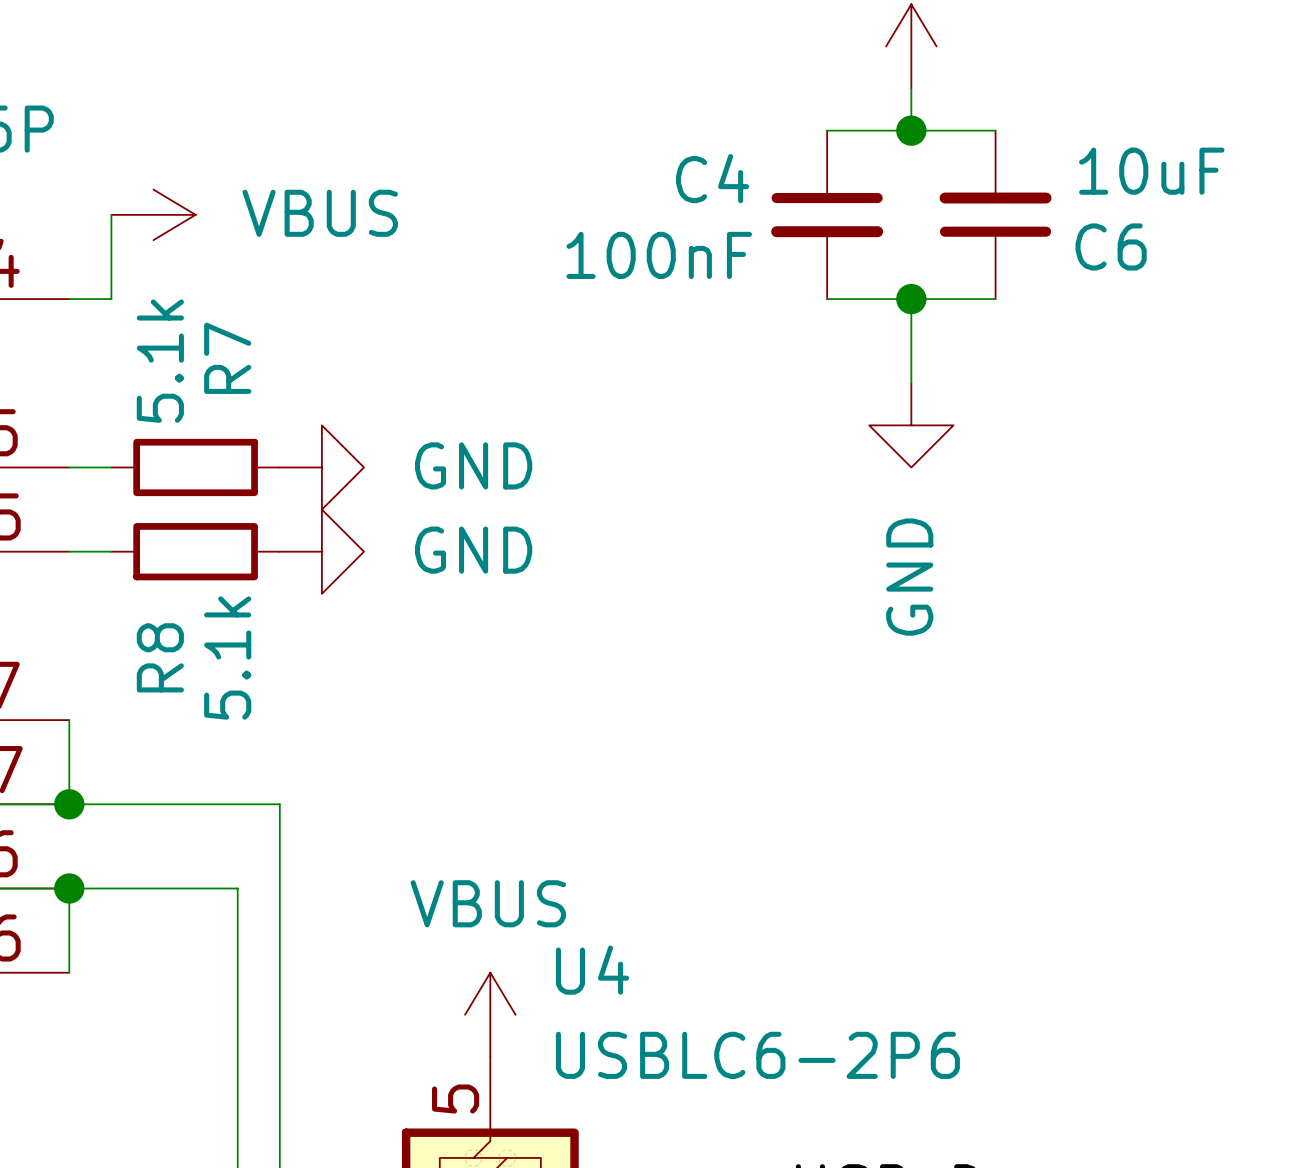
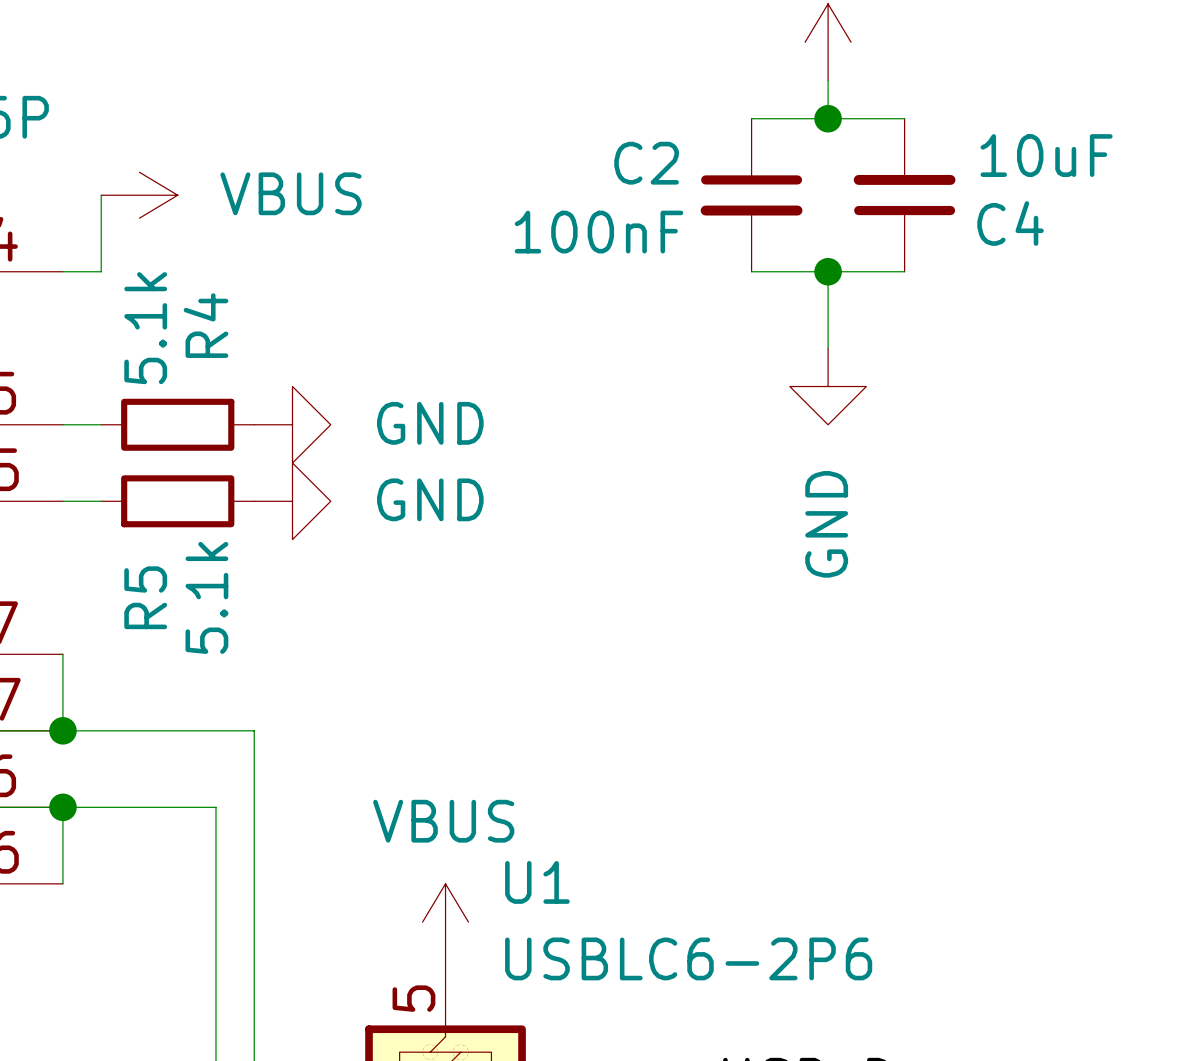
C4 name: C4 (712, 178) -> C2 (646, 163)
C6 name: C6 (1111, 246) -> C4 (1010, 223)
R7 name: R7 (227, 358) -> R4 (206, 325)
R8 name: R8 (160, 657) -> R5 (145, 597)
U4 name: U4 (592, 970) -> U1 (537, 882)

